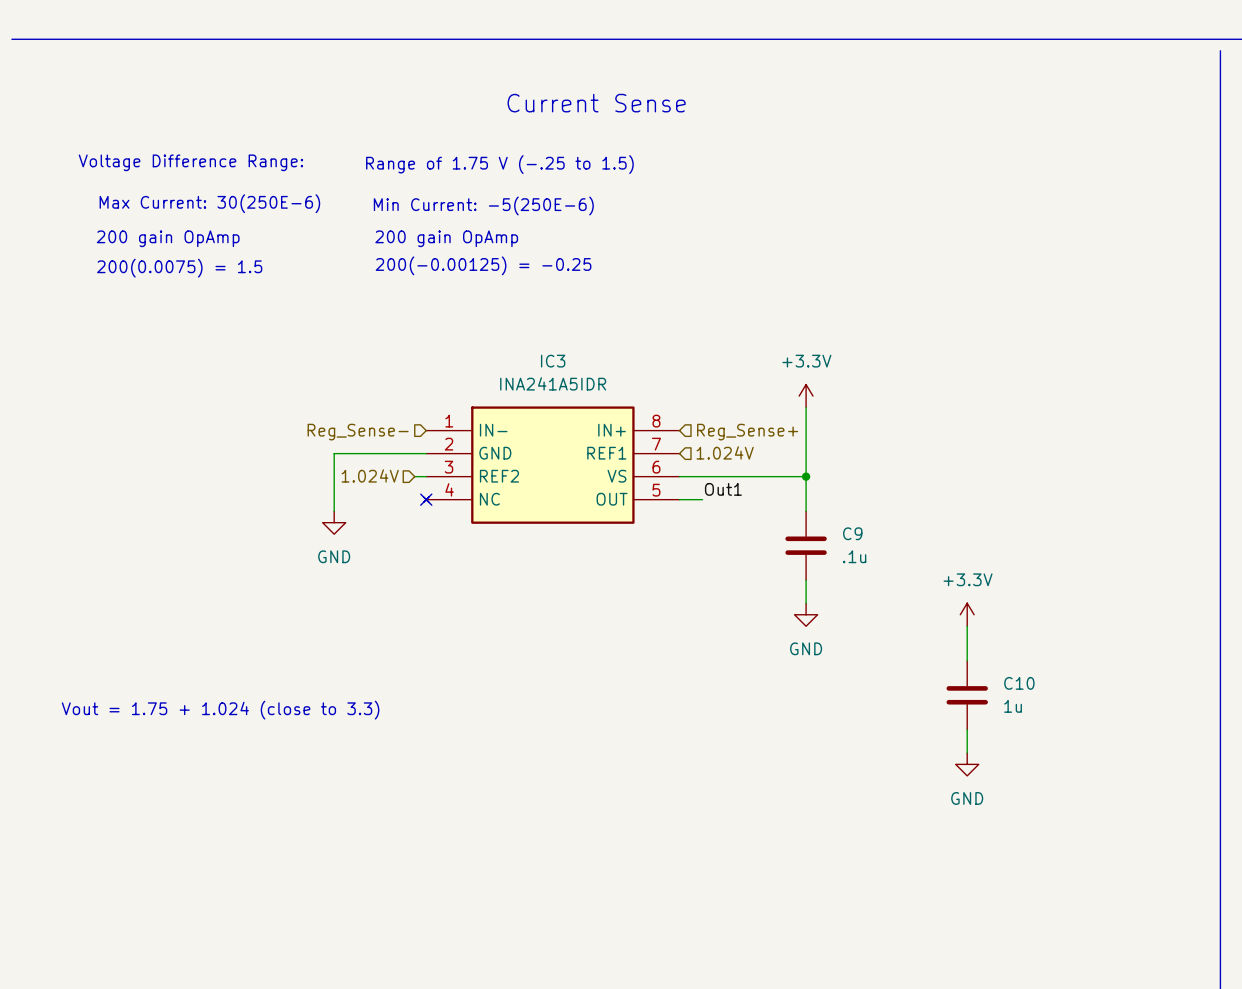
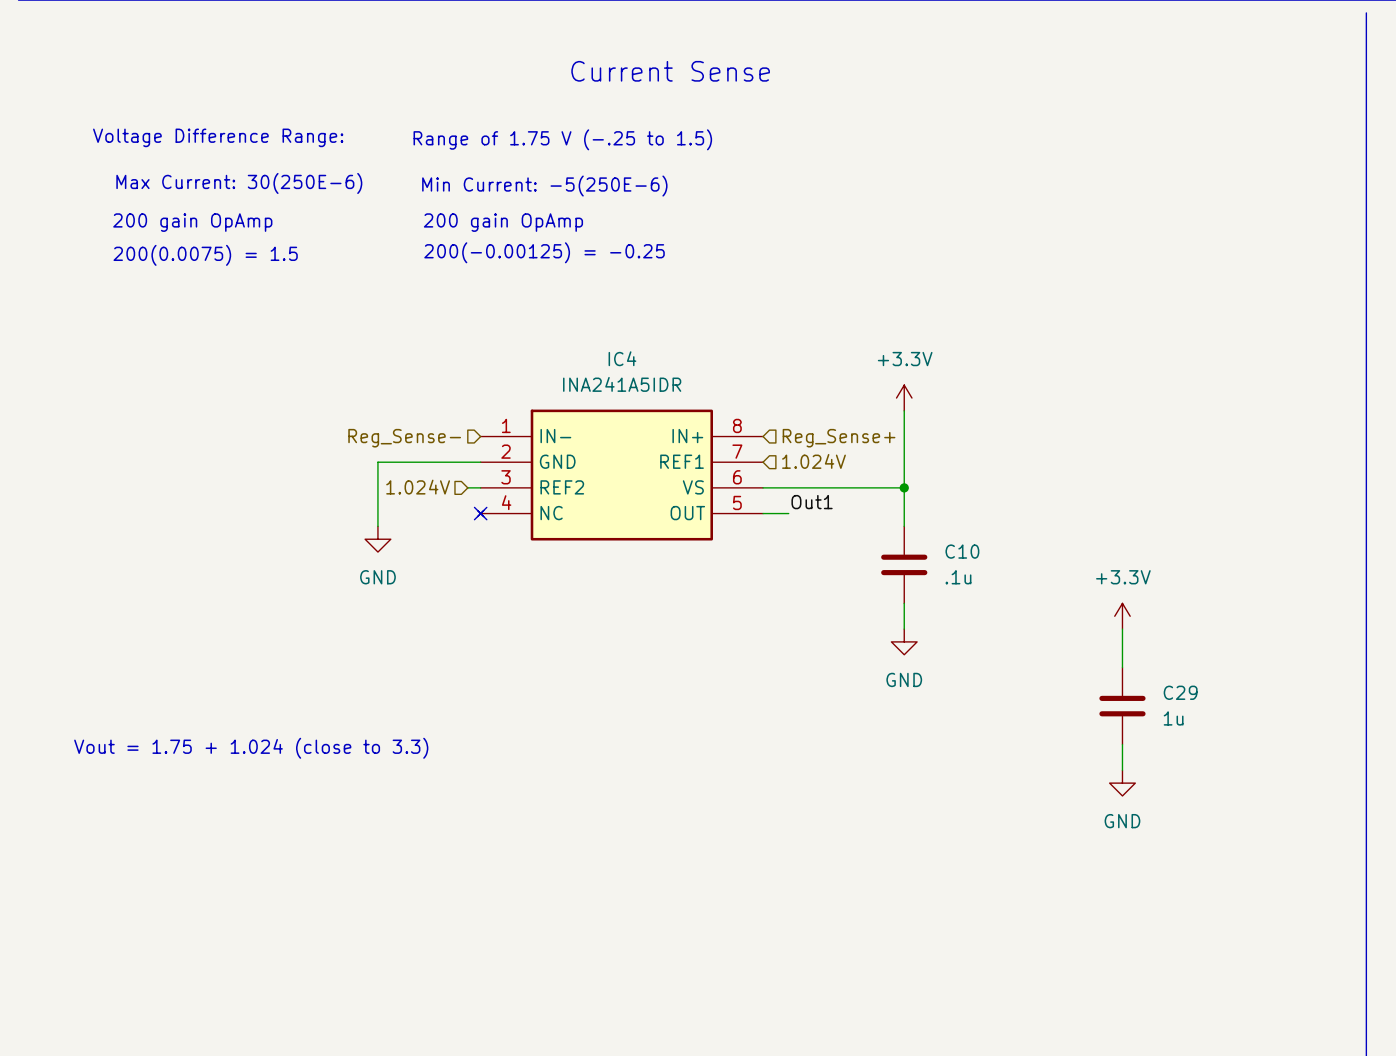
IC3 name: IC3 (553, 361) -> IC4 (622, 358)
C9 name: C9 (852, 533) -> C10 (962, 551)
power symbol position: +3.3V (967, 614) -> +3.3V (1122, 616)
wire: (967, 626) (967, 660) -> (1122, 629) (1122, 667)
C29: none -> 1u (1122, 706)
C10: 1u (967, 695) -> none
wire: (967, 729) (967, 752) -> (1122, 744) (1122, 770)
power symbol position: GND (967, 764) -> GND (1122, 783)

